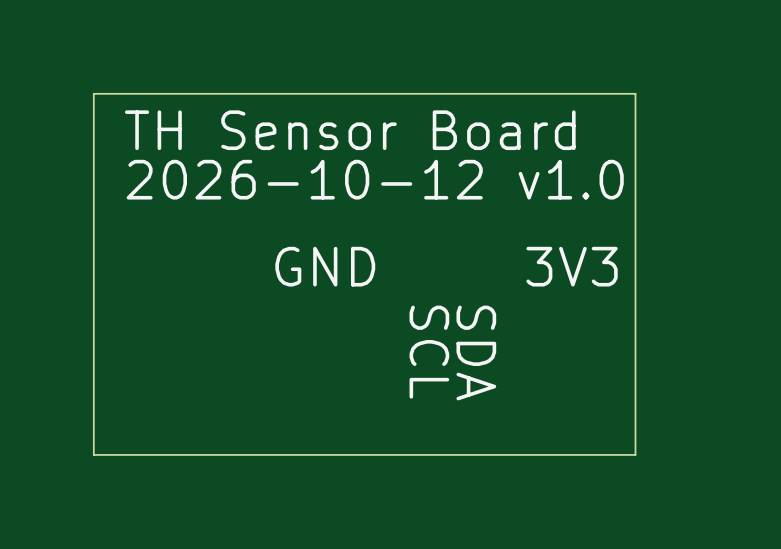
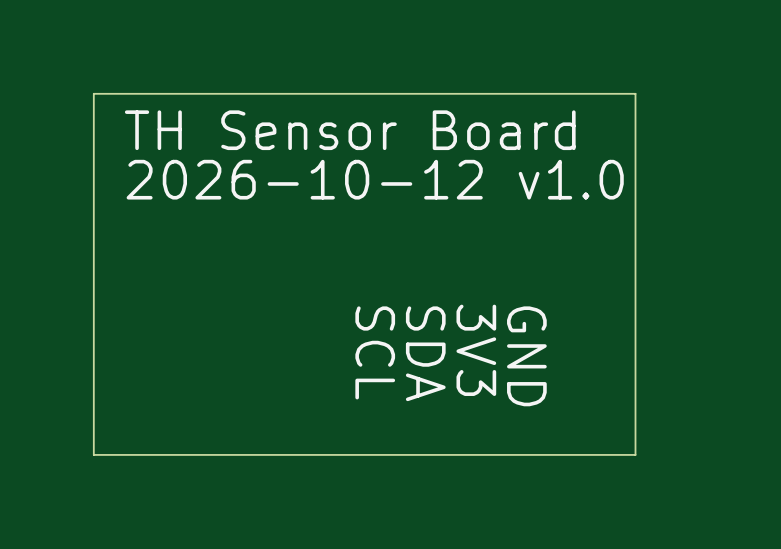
text rotation: 0° (325, 266) -> 90° clockwise (526, 356)
text position: GND (325, 266) -> GND (526, 356)
text: 3V3 (572, 266) -> none
text position: SCL (429, 352) -> SCL (375, 352)
text: SDA (476, 352) -> 3V3 (476, 350)
text: none -> SDA (425, 353)

